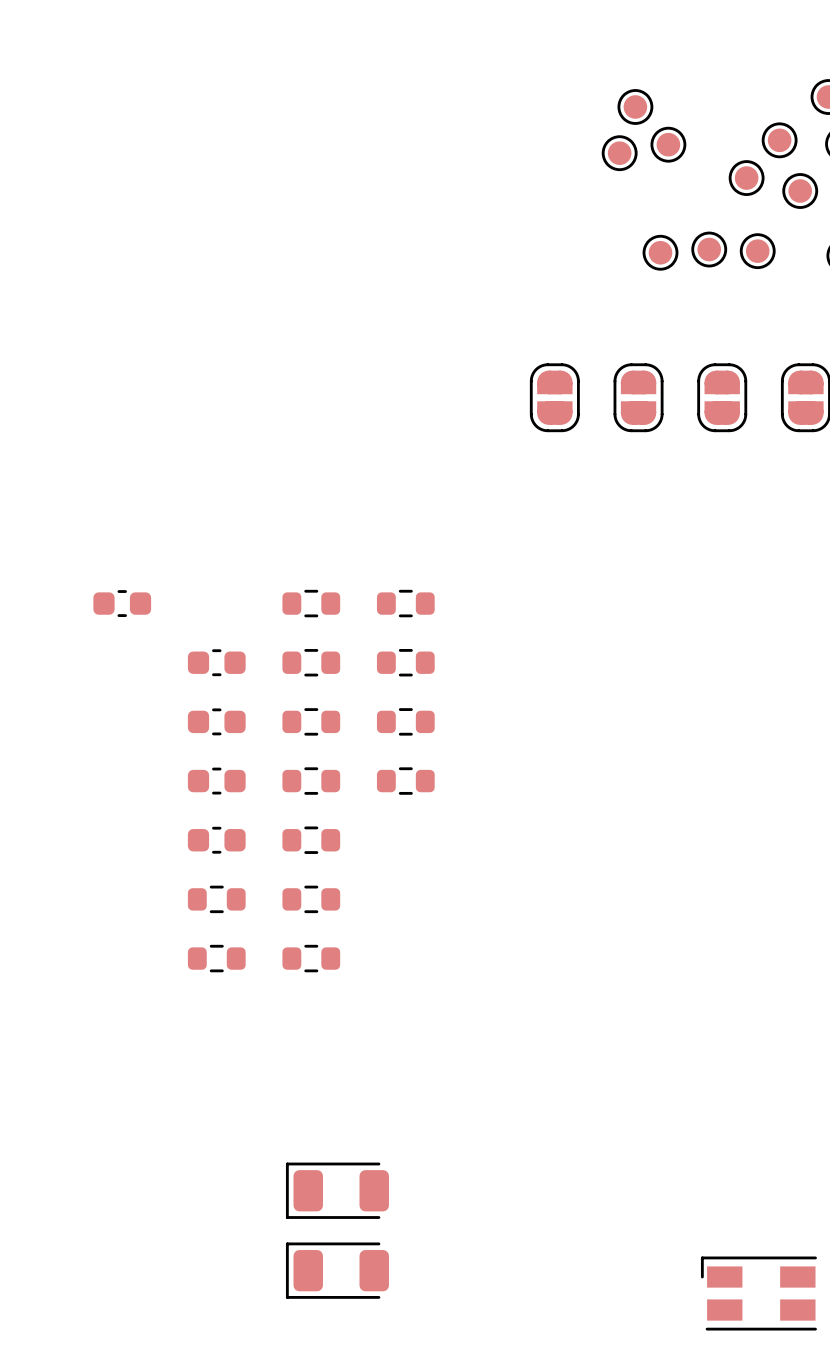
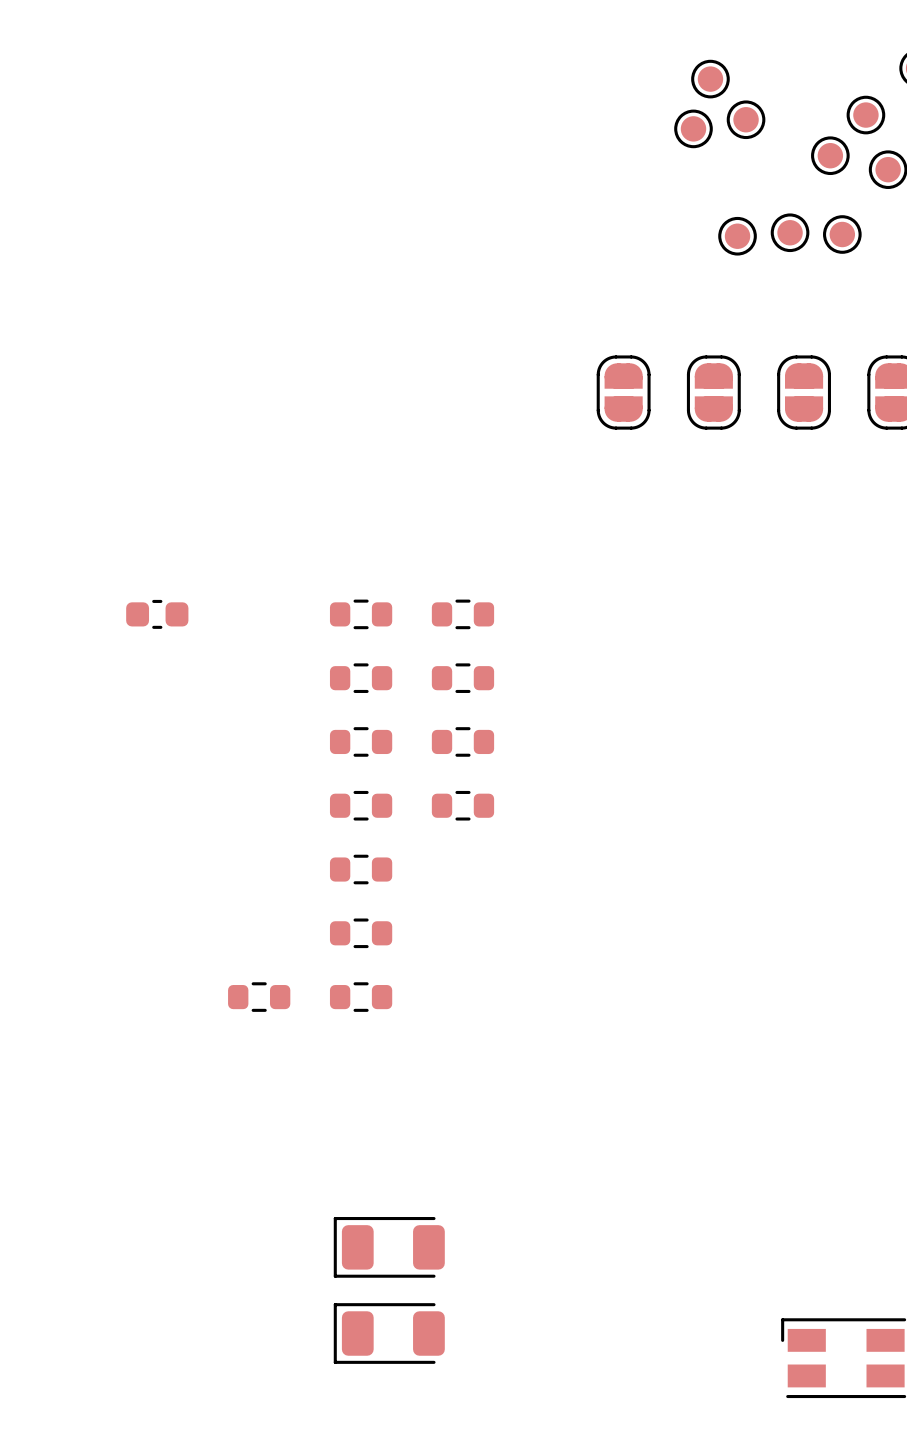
part: (216, 662) -> none
part: (216, 721) -> none
part: (216, 781) -> none
part: (216, 840) -> none
part: (216, 899) -> none

